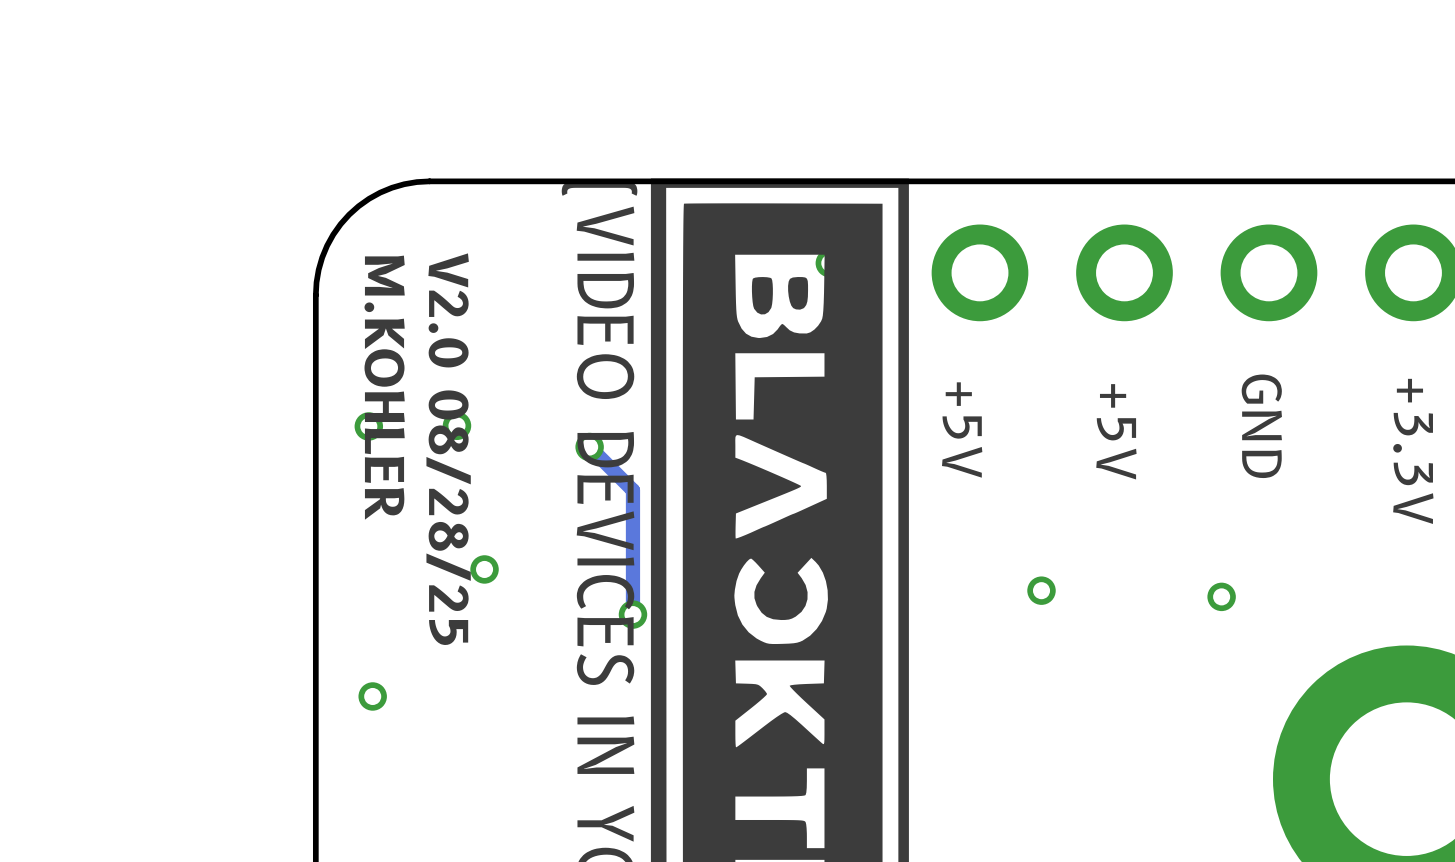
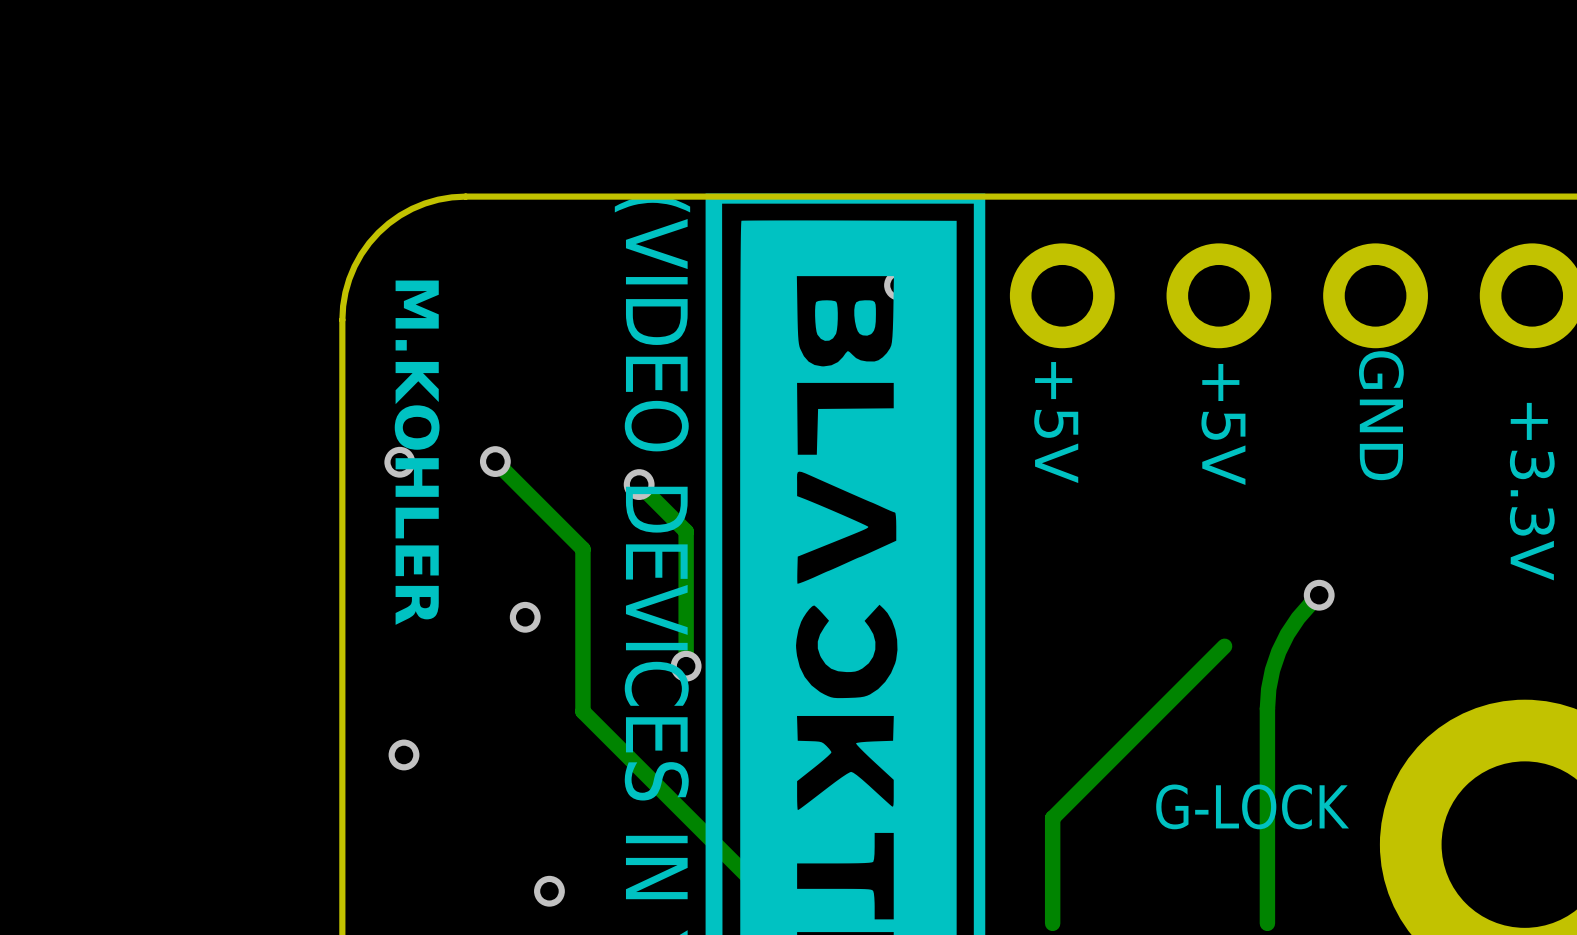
track: none -> (495, 461) (582, 549) (582, 711) (794, 922) (842, 922)
text position: GND (1261, 426) -> GND (1381, 415)
text position: +5V (962, 430) -> +5V (1056, 422)
text position: +5V (1116, 431) -> +5V (1223, 424)
text: V2.0 08/28/25 (448, 449) -> none
track: none -> (1319, 595) (1298, 618) (1287, 634) (1278, 651) (1268, 689) (1267, 923)
via: (1041, 590) -> none
track: none -> (1224, 646) (1052, 818) (1052, 923)
via position: (1221, 596) -> (1319, 595)
text: none -> G-LOCK (1252, 806)
via: none -> (549, 891)

